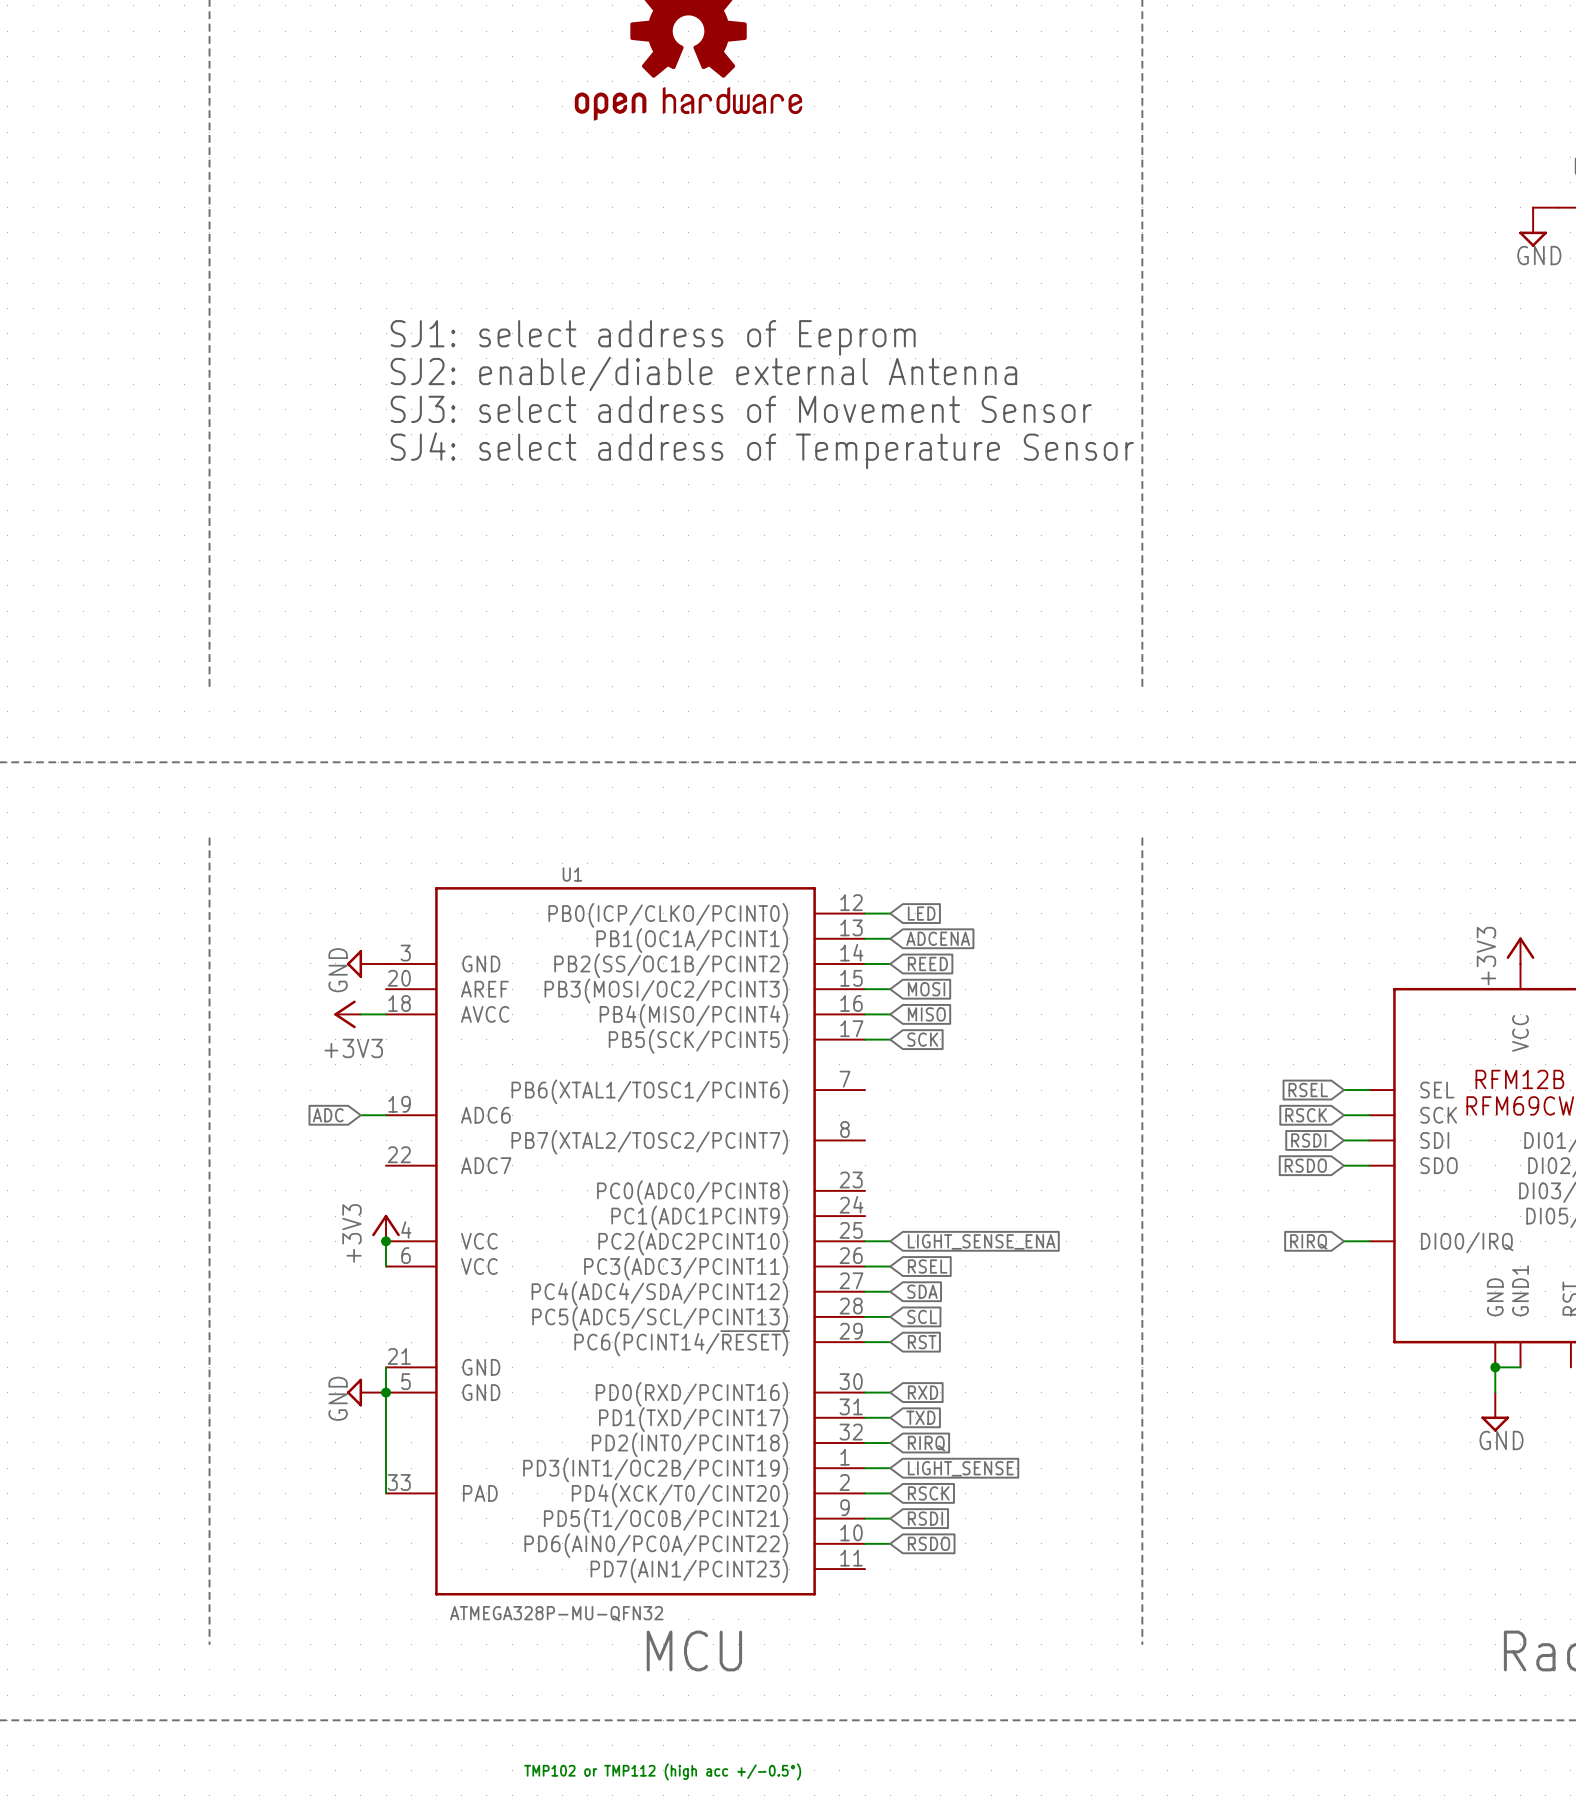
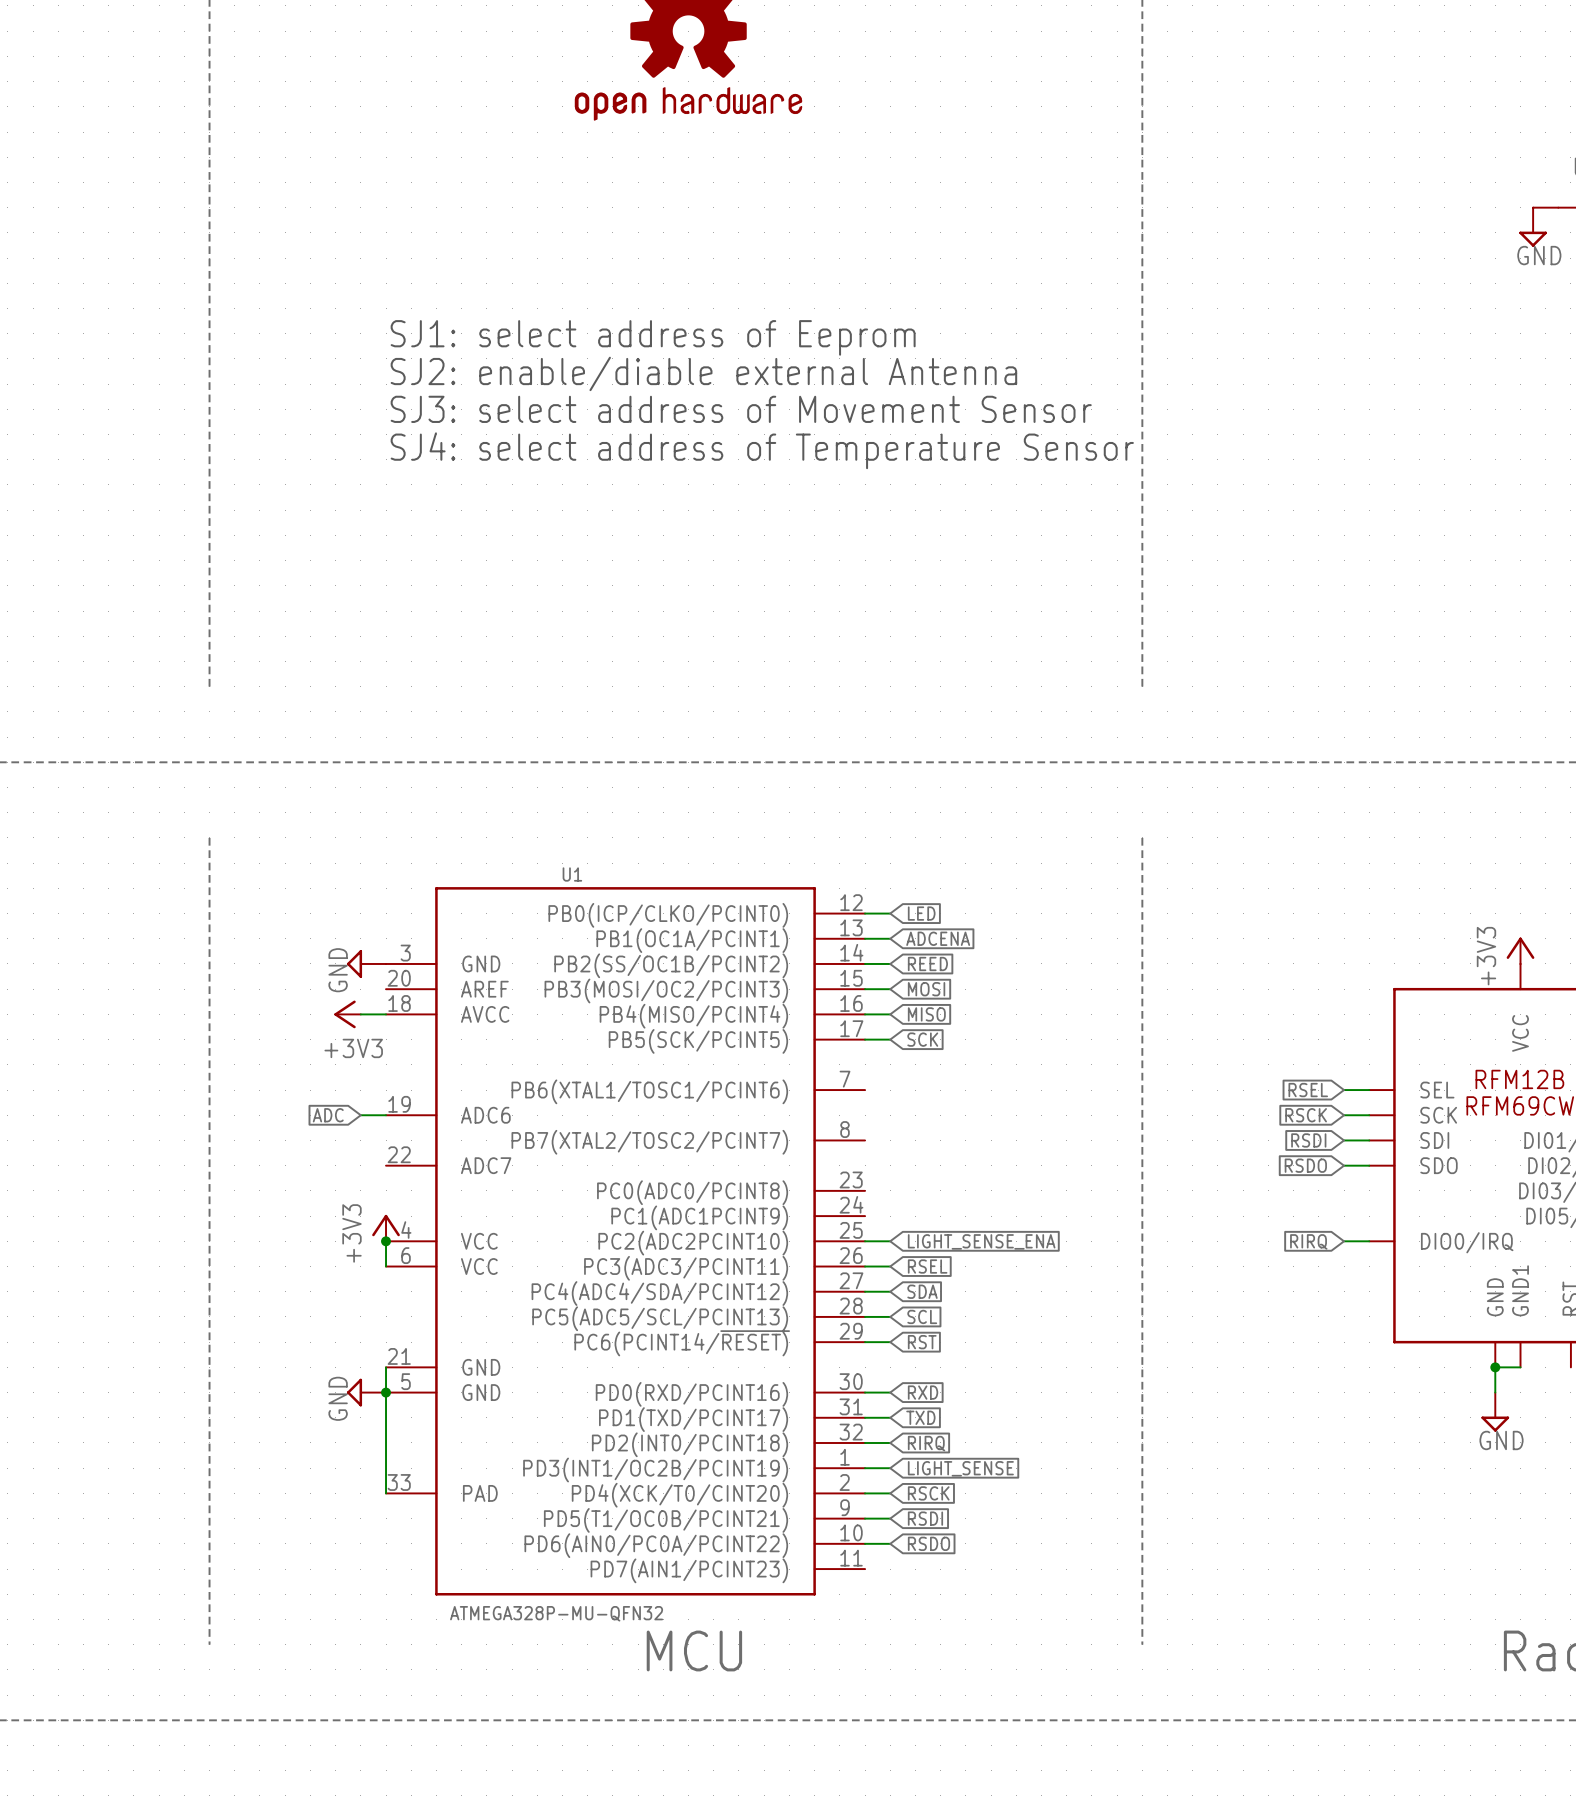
text: TMP102 or TMP112 (high acc +/-0.5°) (662, 1771) -> none

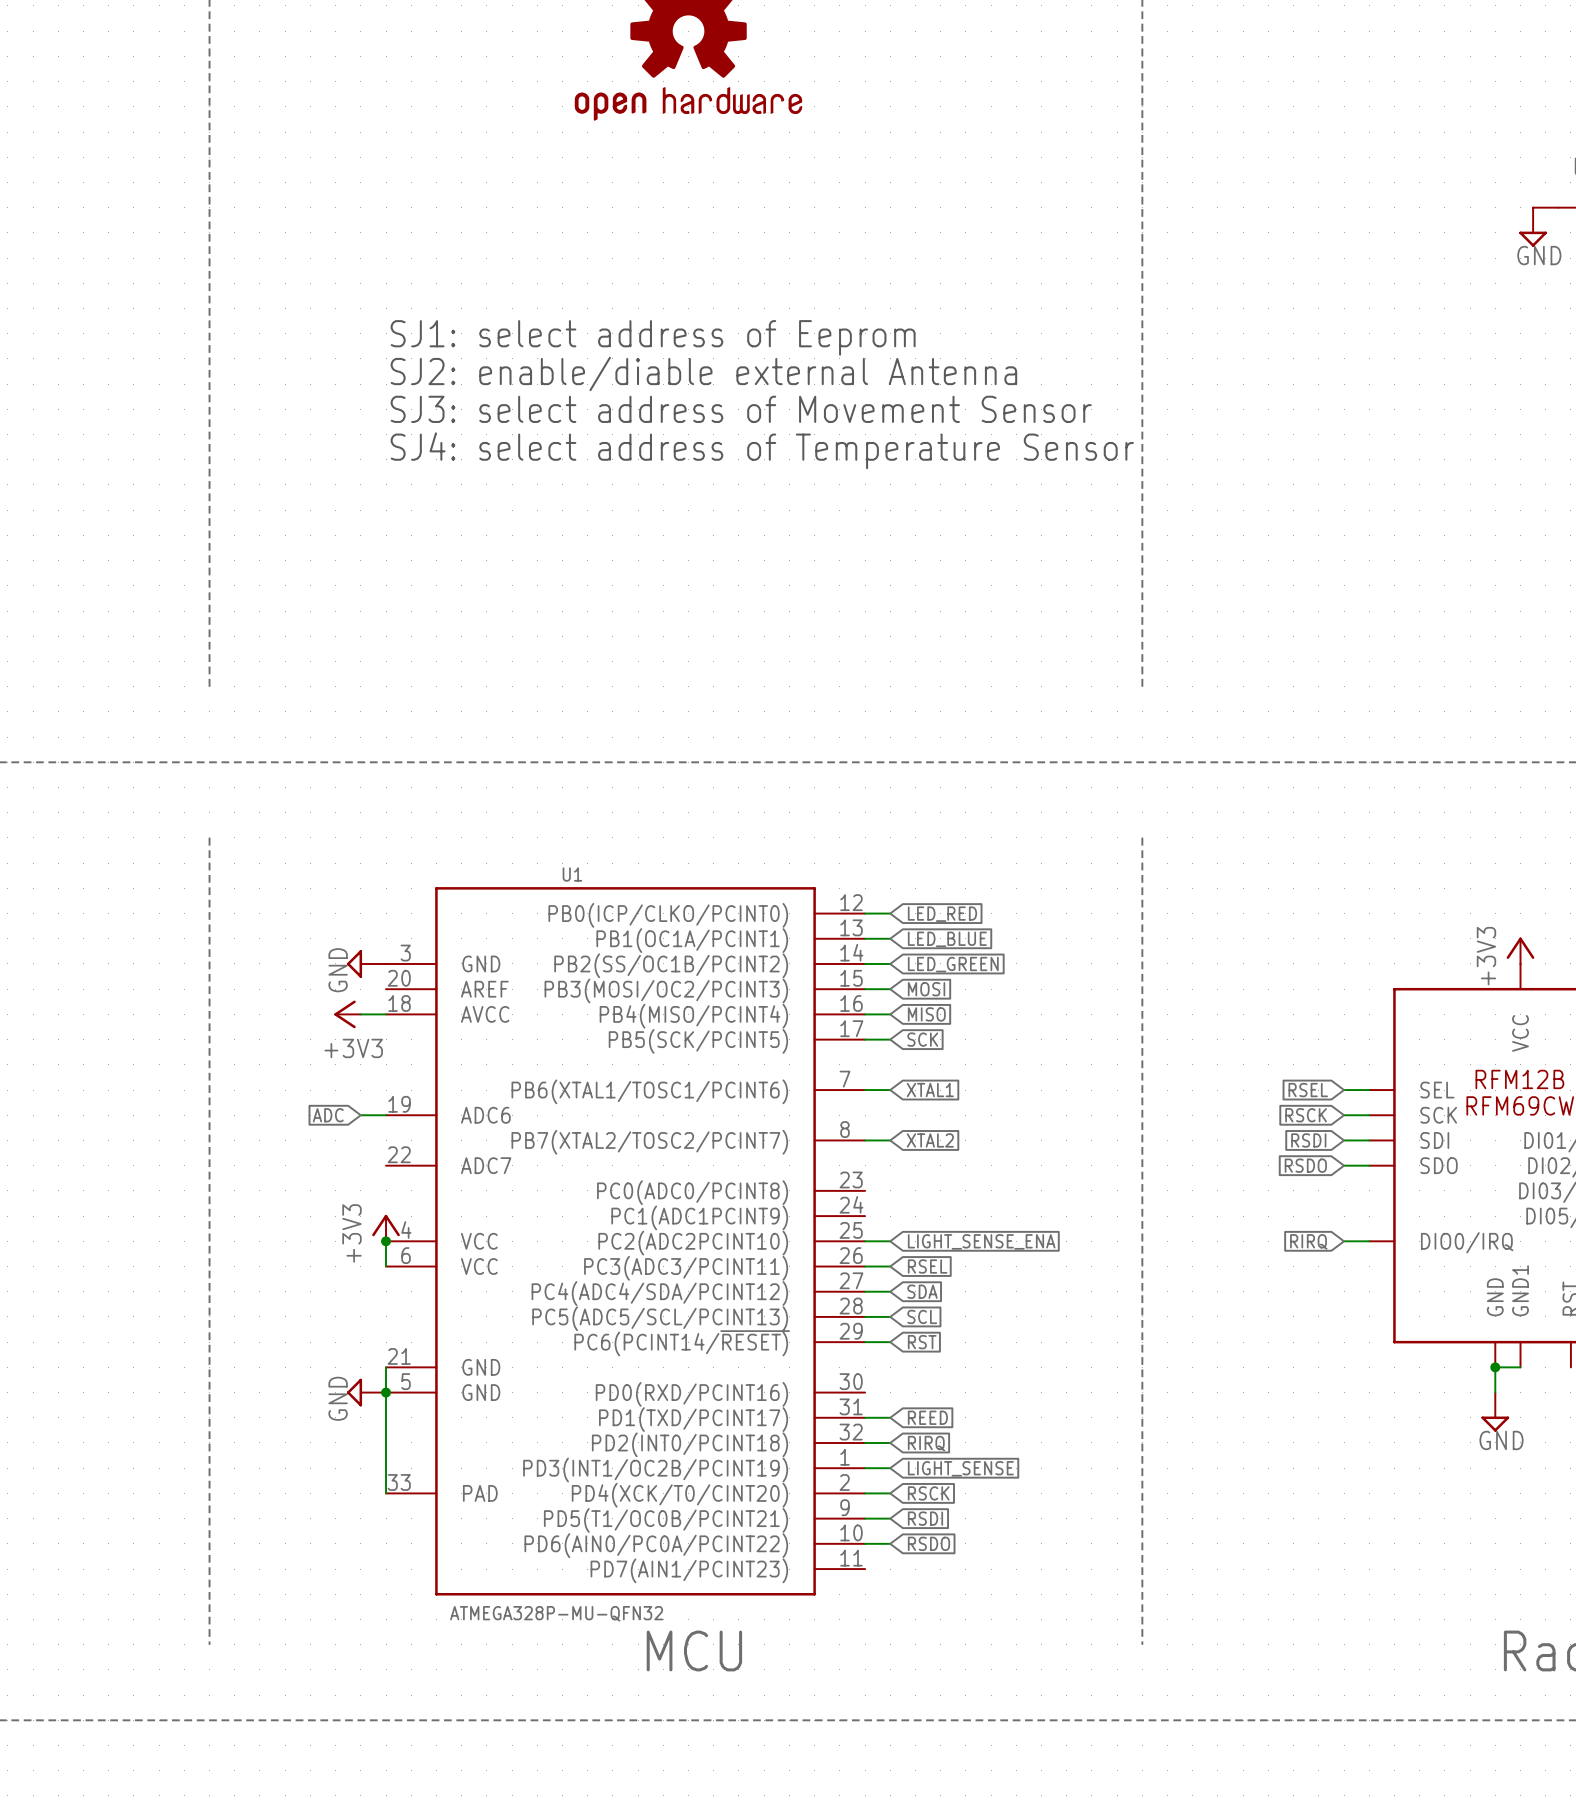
global label: LED (921, 913) -> LED_RED (942, 914)
global label: ADCENA (938, 938) -> LED_BLUE (947, 939)
global label: REED (927, 963) -> LED_GREEN (953, 964)
wire: none -> (865, 1090) (890, 1090)
global label: none -> XTAL1 (930, 1090)
wire: none -> (865, 1140) (890, 1140)
global label: none -> XTAL2 (930, 1140)
wire: (865, 1392) (890, 1392) -> none
global label: RXD (923, 1392) -> none
global label: TXD (920, 1417) -> REED (927, 1417)

